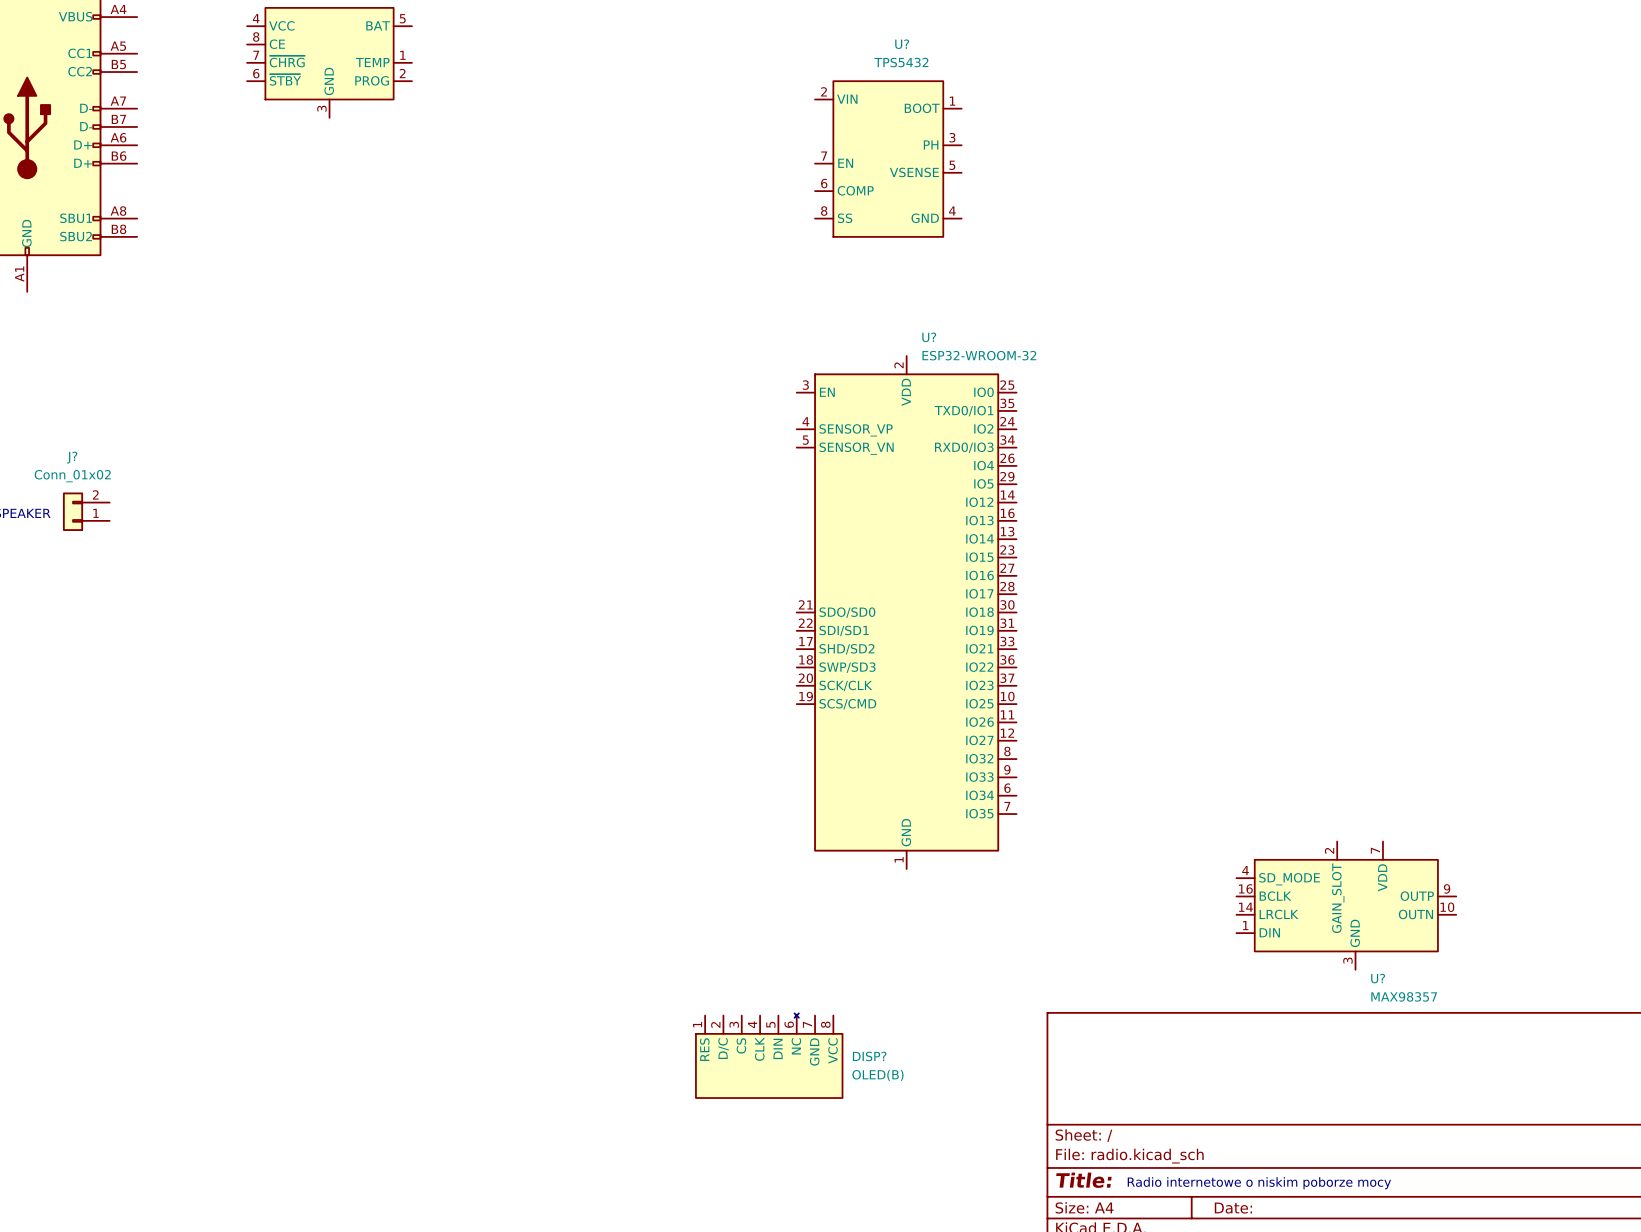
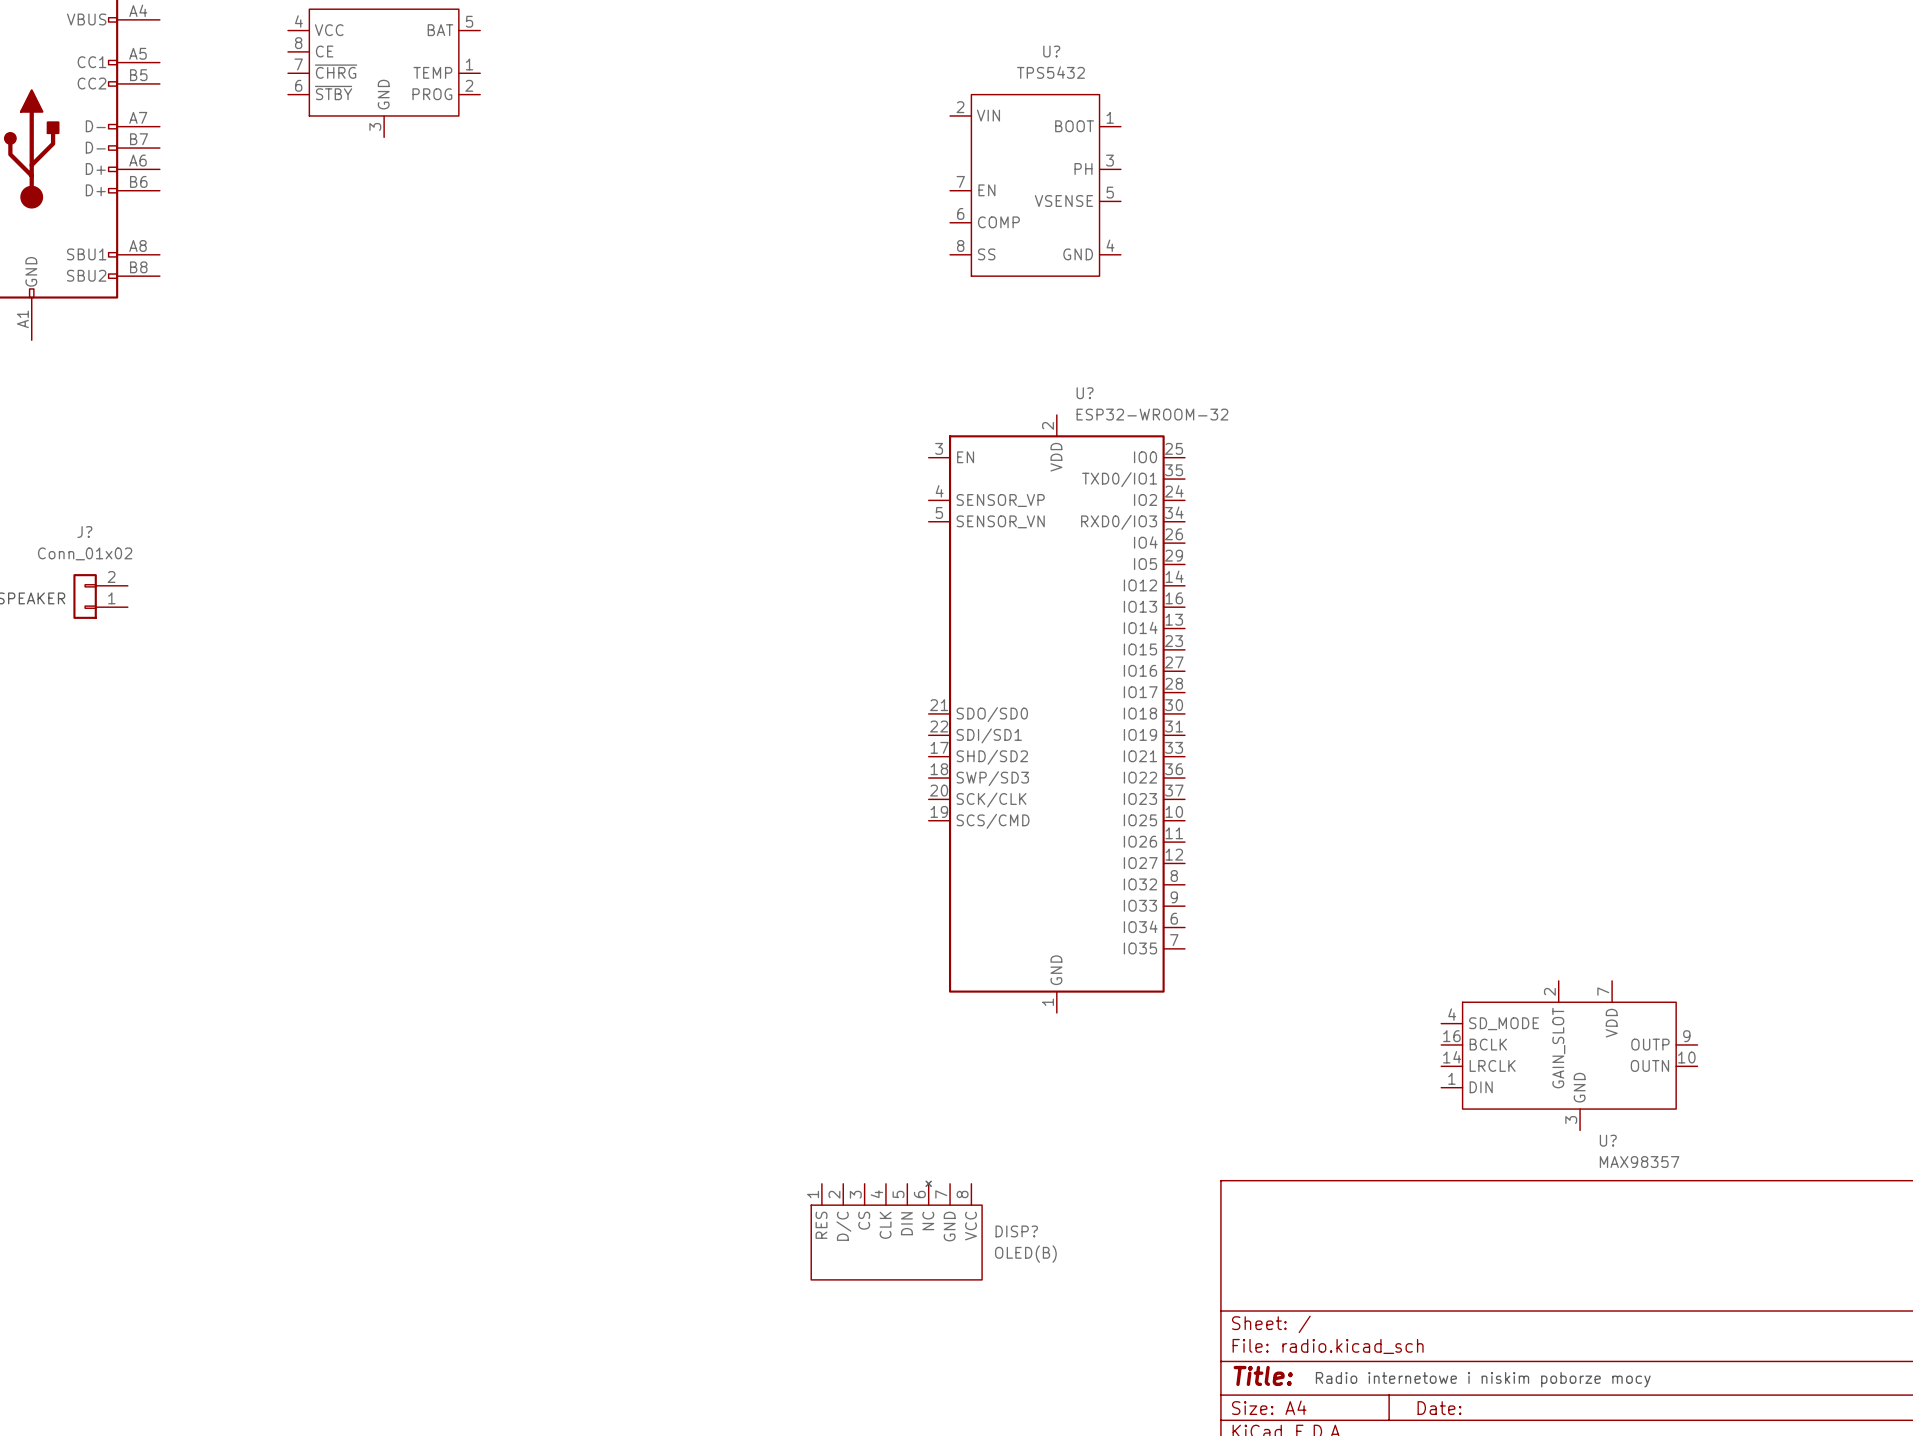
text: Radio internetowe o niskim poborze mocy (1259, 1183) -> Radio internetowe i niskim poborze mocy (1483, 1379)

